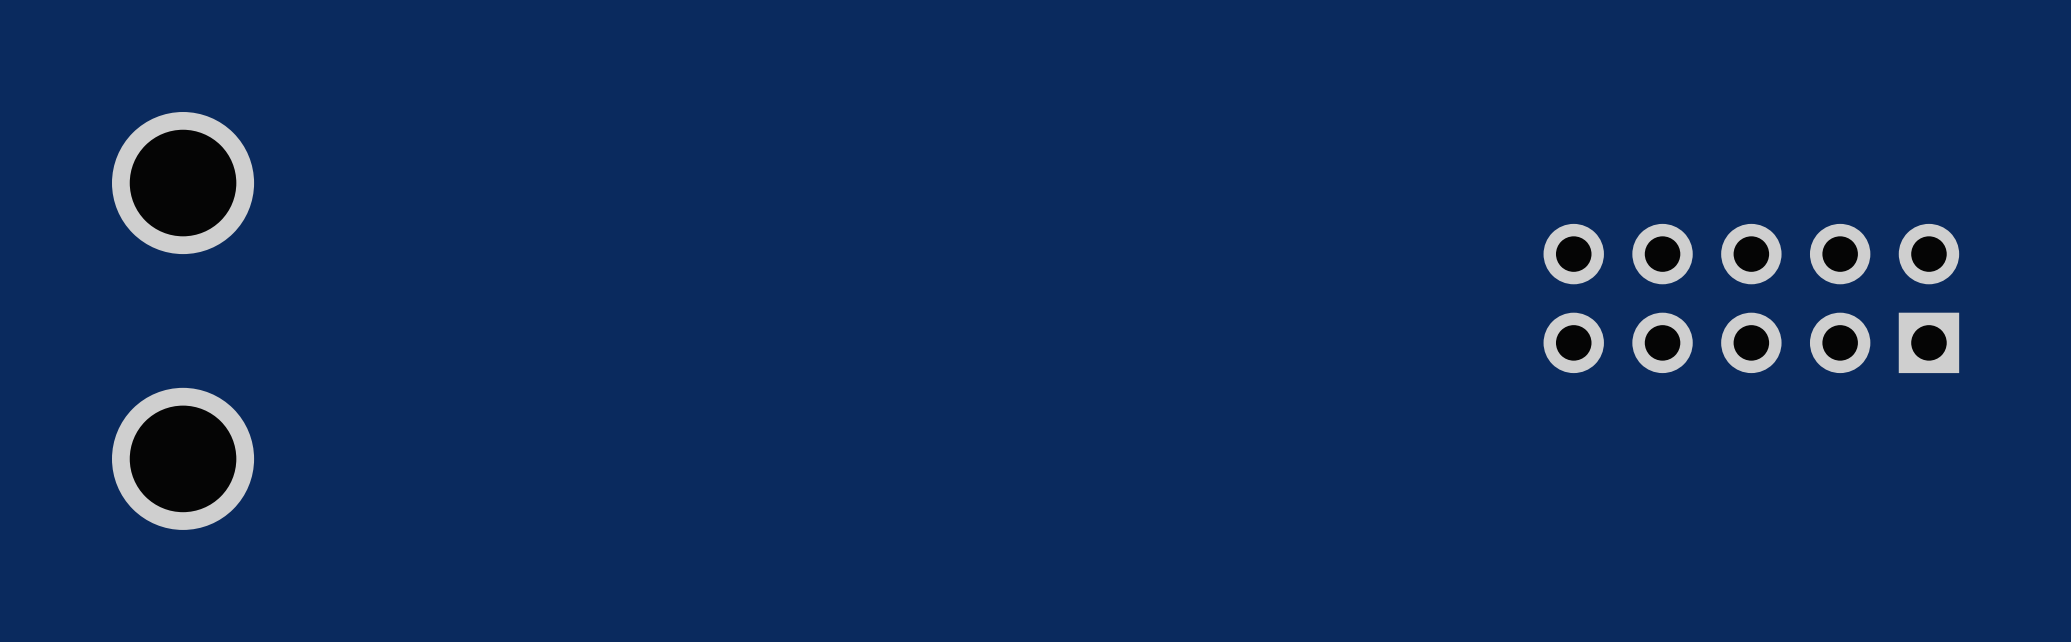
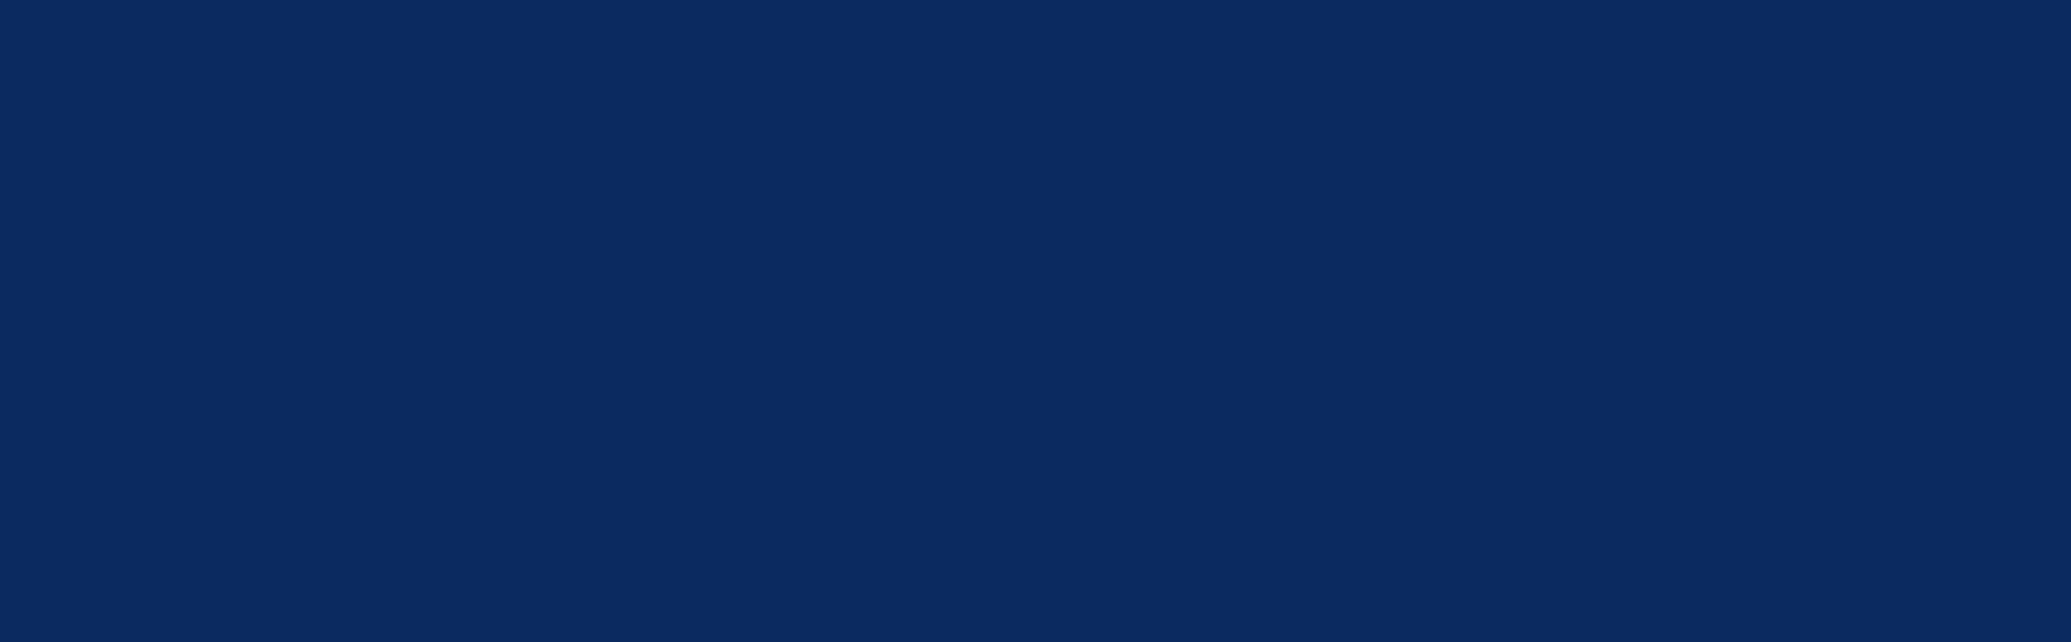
part: (183, 183) -> none
part: (1751, 298) -> none
part: (183, 458) -> none

